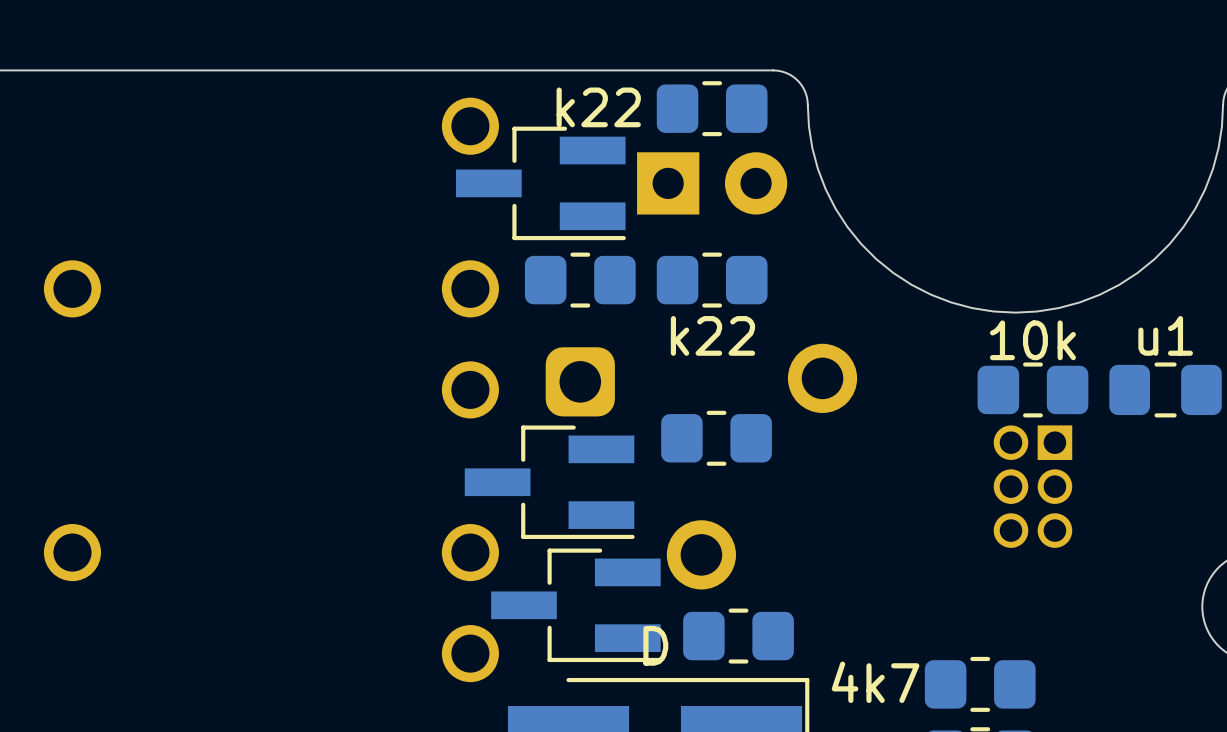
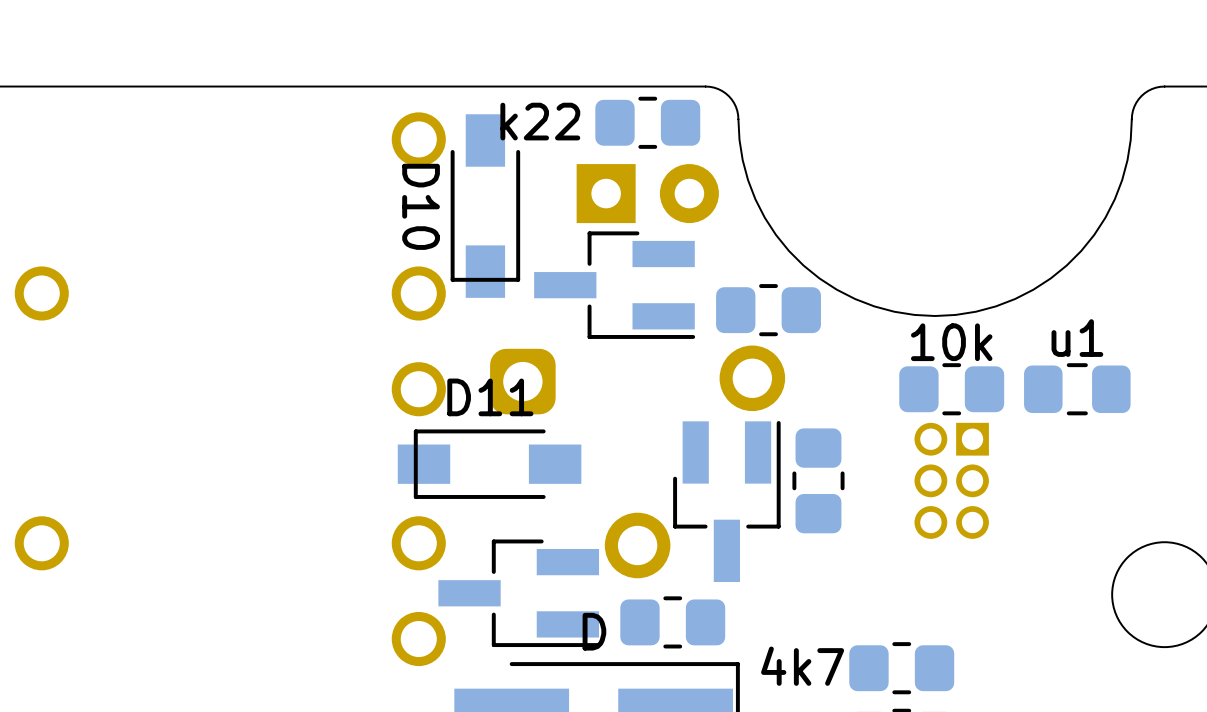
part: (540, 183) -> none
D10: none -> (485, 206)
part: (580, 280) -> none
part: none -> (614, 285)
part: k22 (712, 280) -> none
part: none -> (768, 310)
part: (716, 438) -> none
D11: none -> (489, 464)
part: (549, 482) -> none
part: none -> (818, 480)
part: none -> (726, 501)

